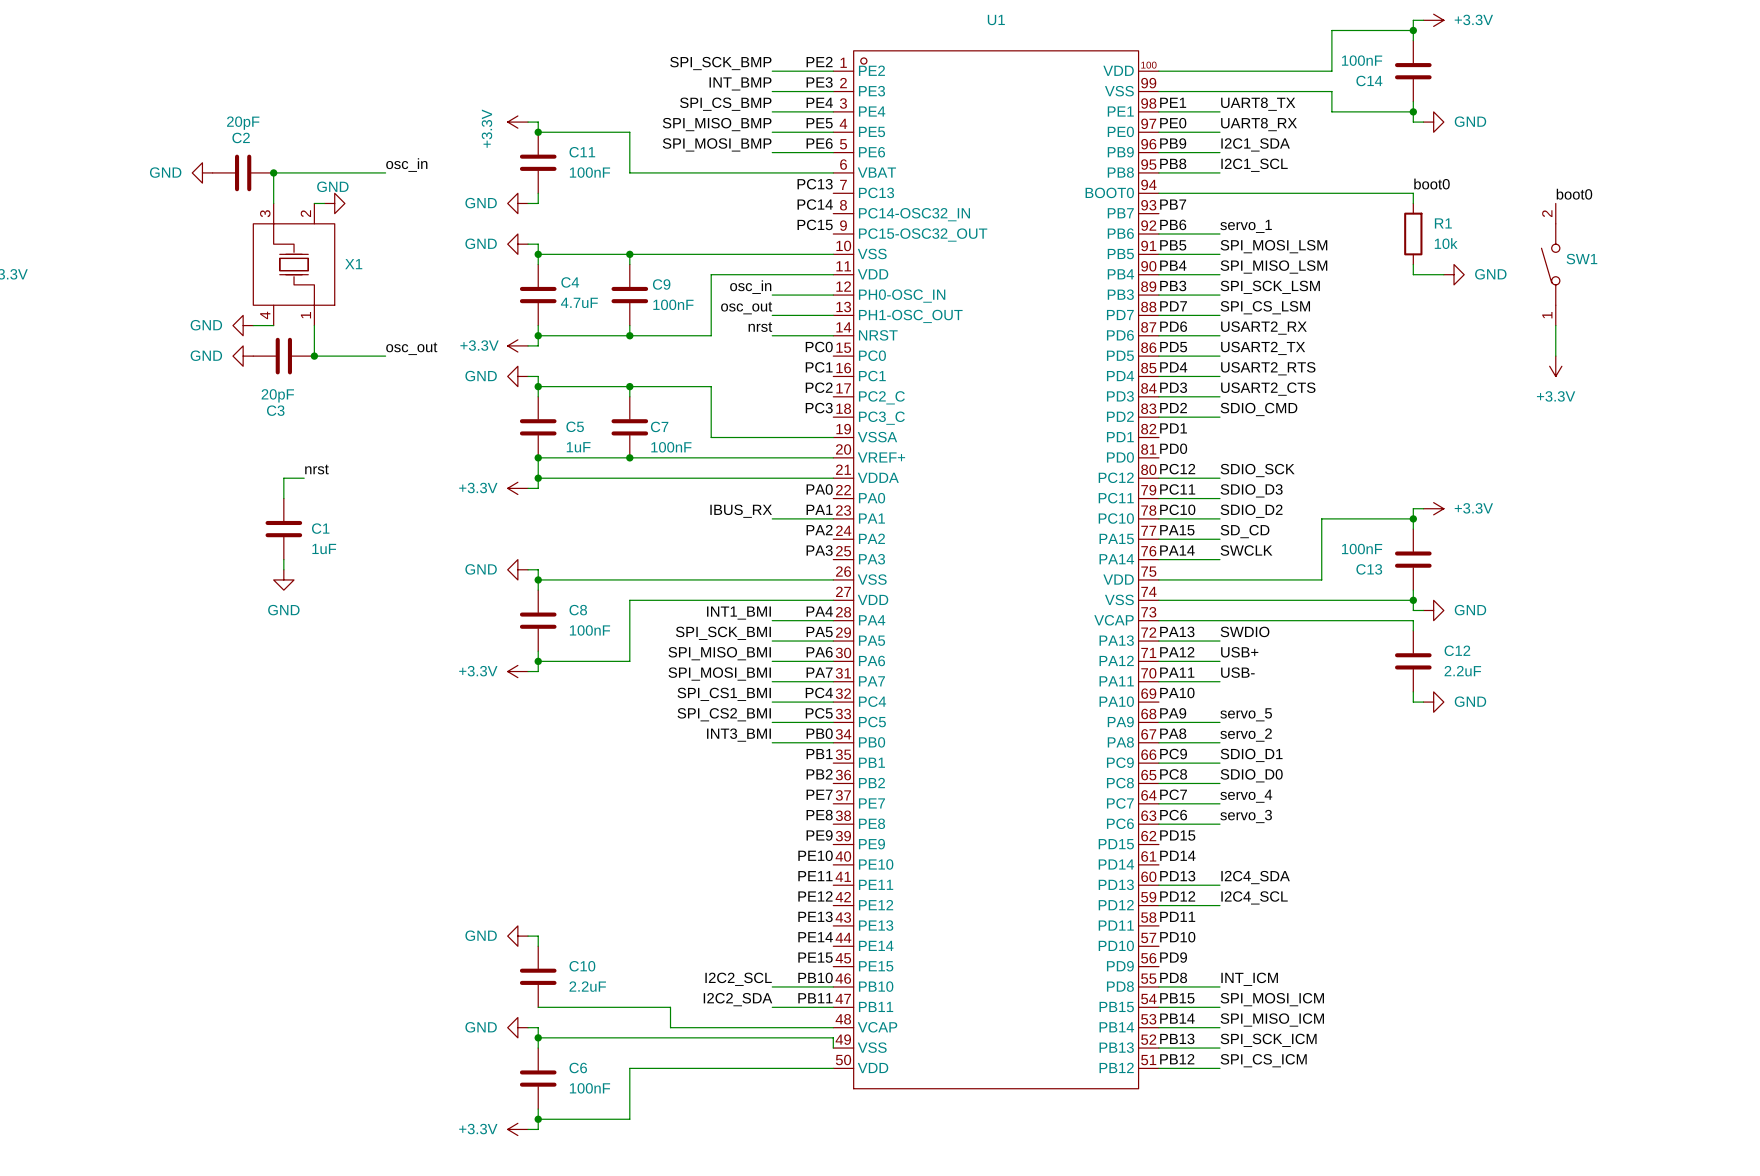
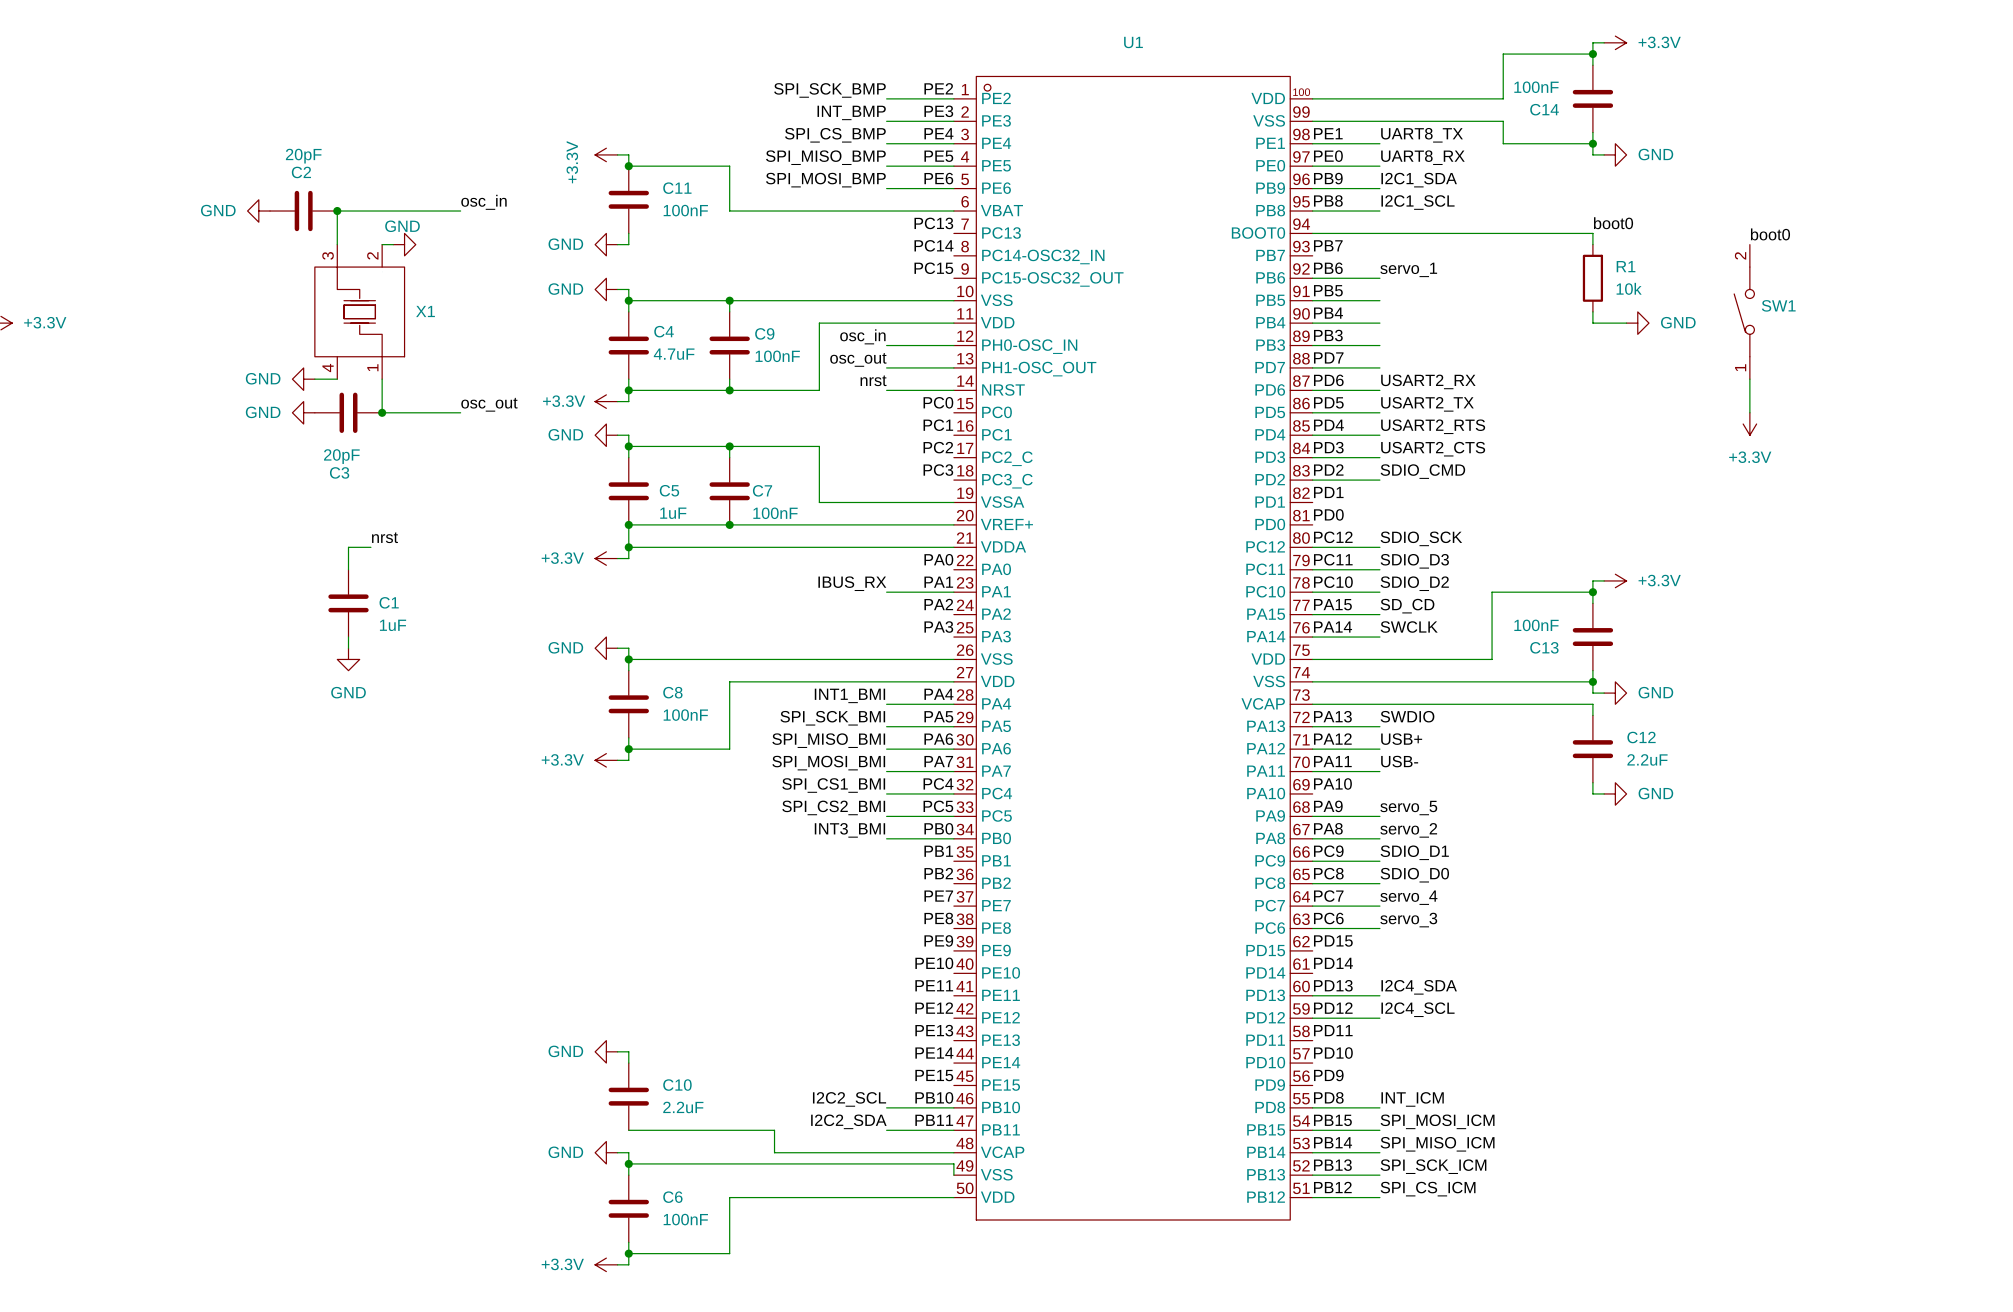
label: SPI_MOSI_LSM (1273, 246) -> none
label: SPI_MISO_LSM (1273, 267) -> none
label: SPI_SCK_LSM (1270, 287) -> none
label: SPI_CS_LSM (1265, 307) -> none

